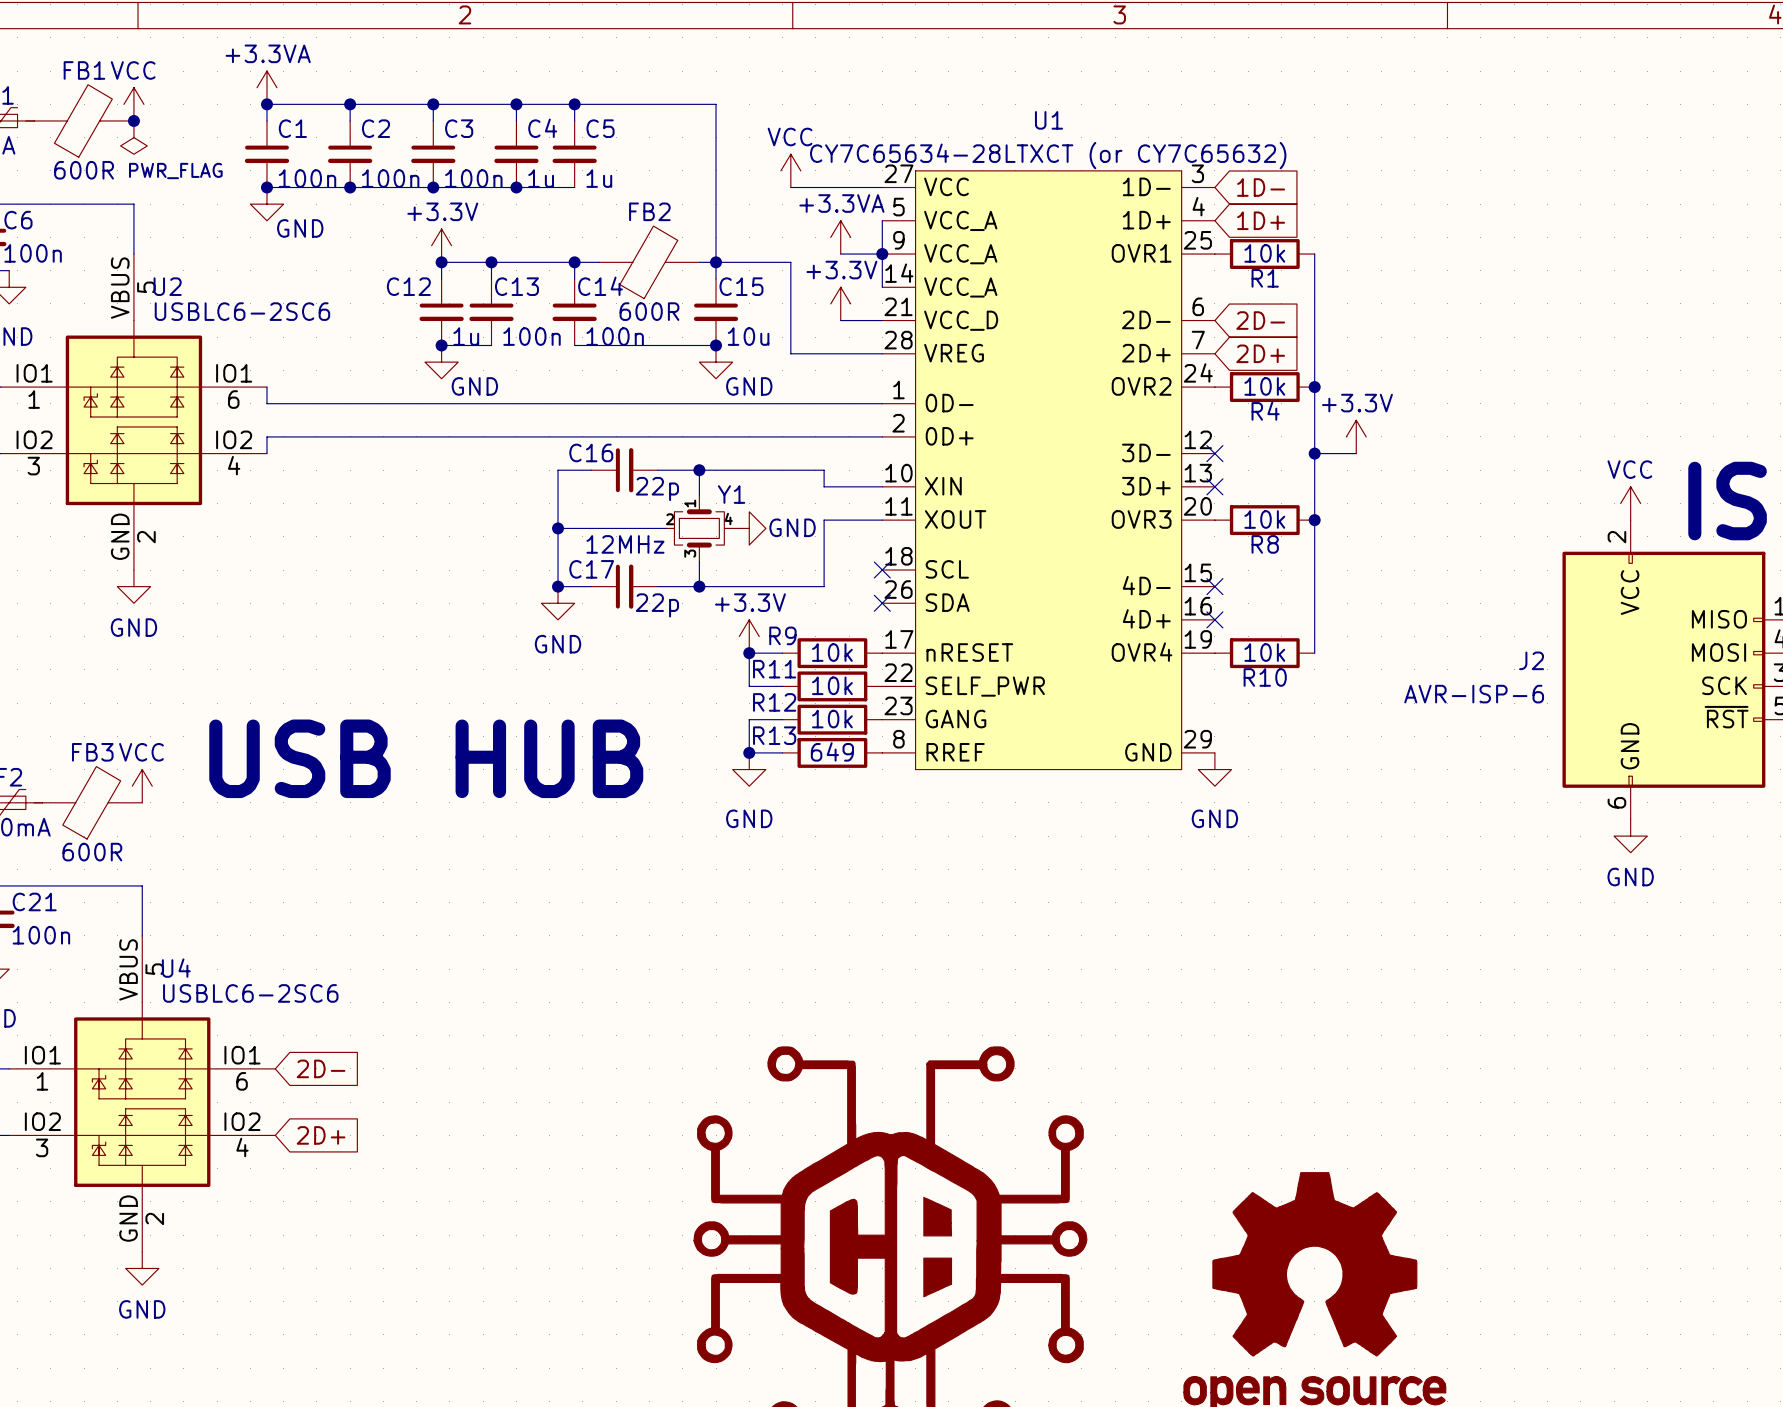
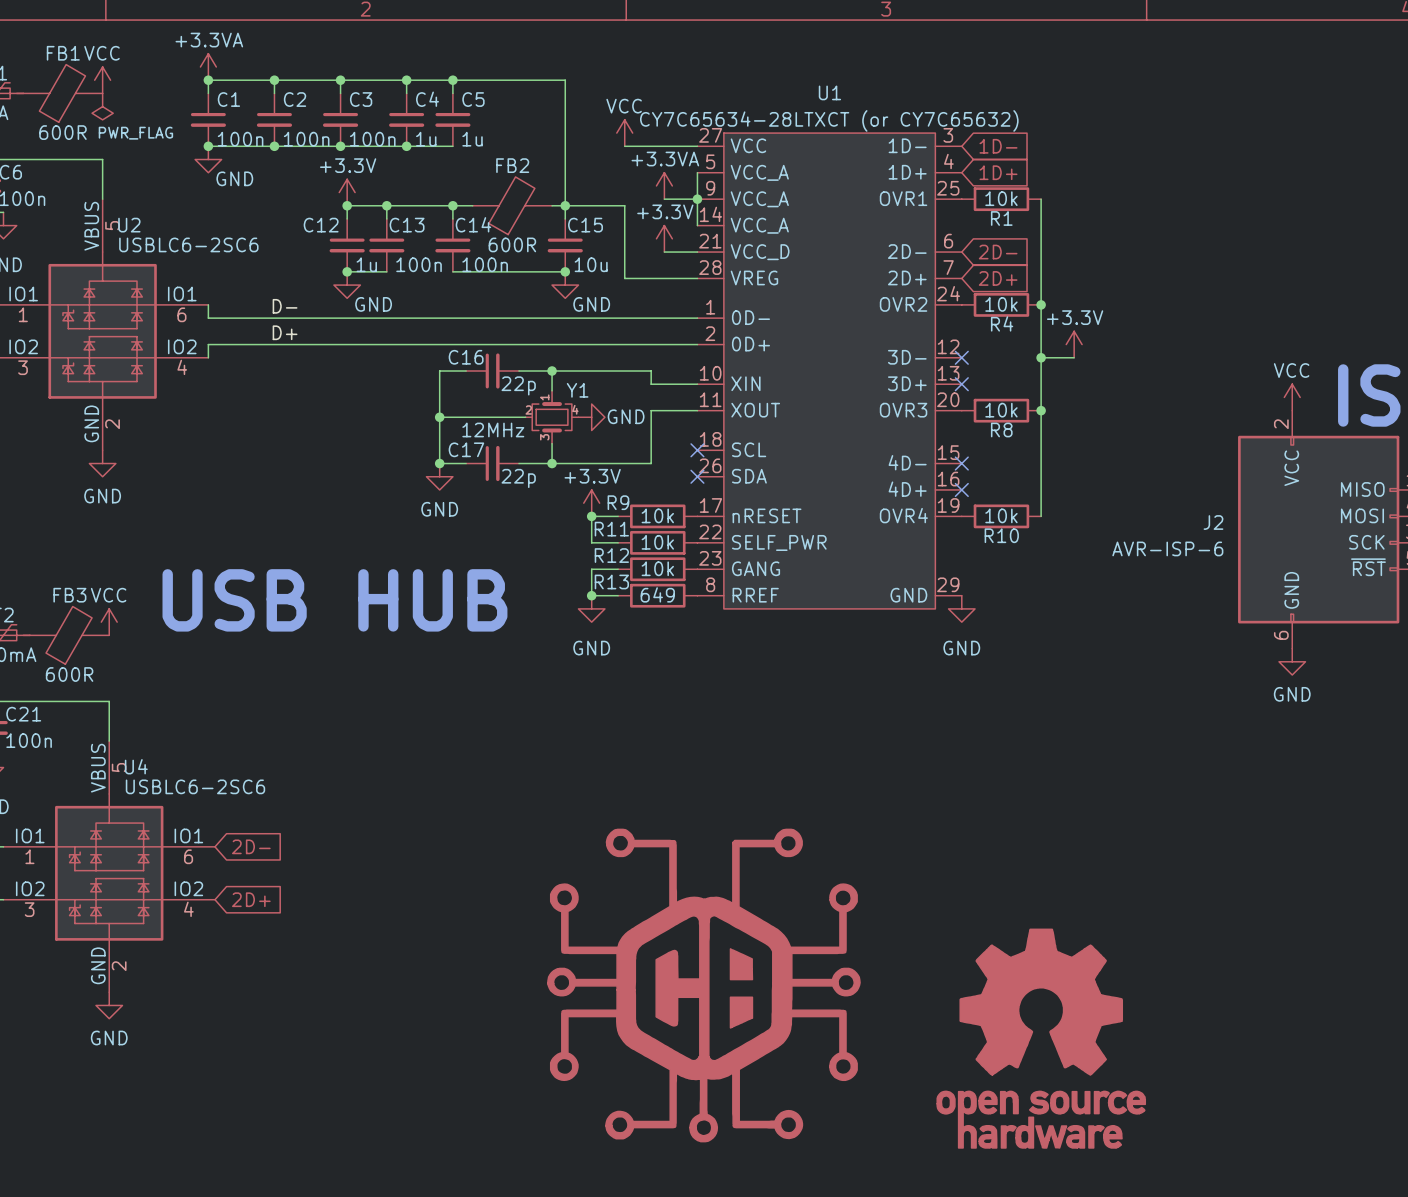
junction: (133, 120) -> none
label: none -> D- (285, 306)
label: none -> D+ (285, 332)

